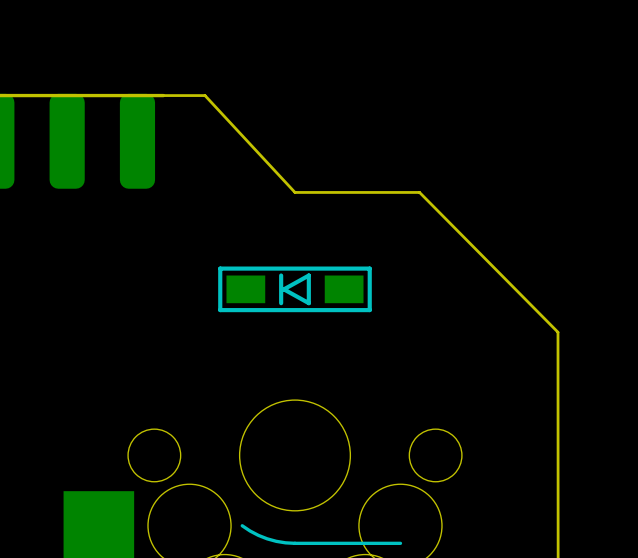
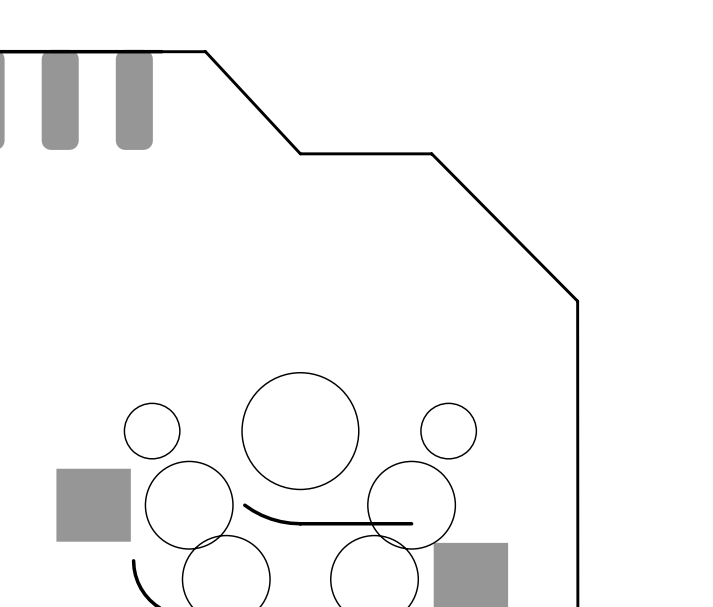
part: (294, 289) -> none

